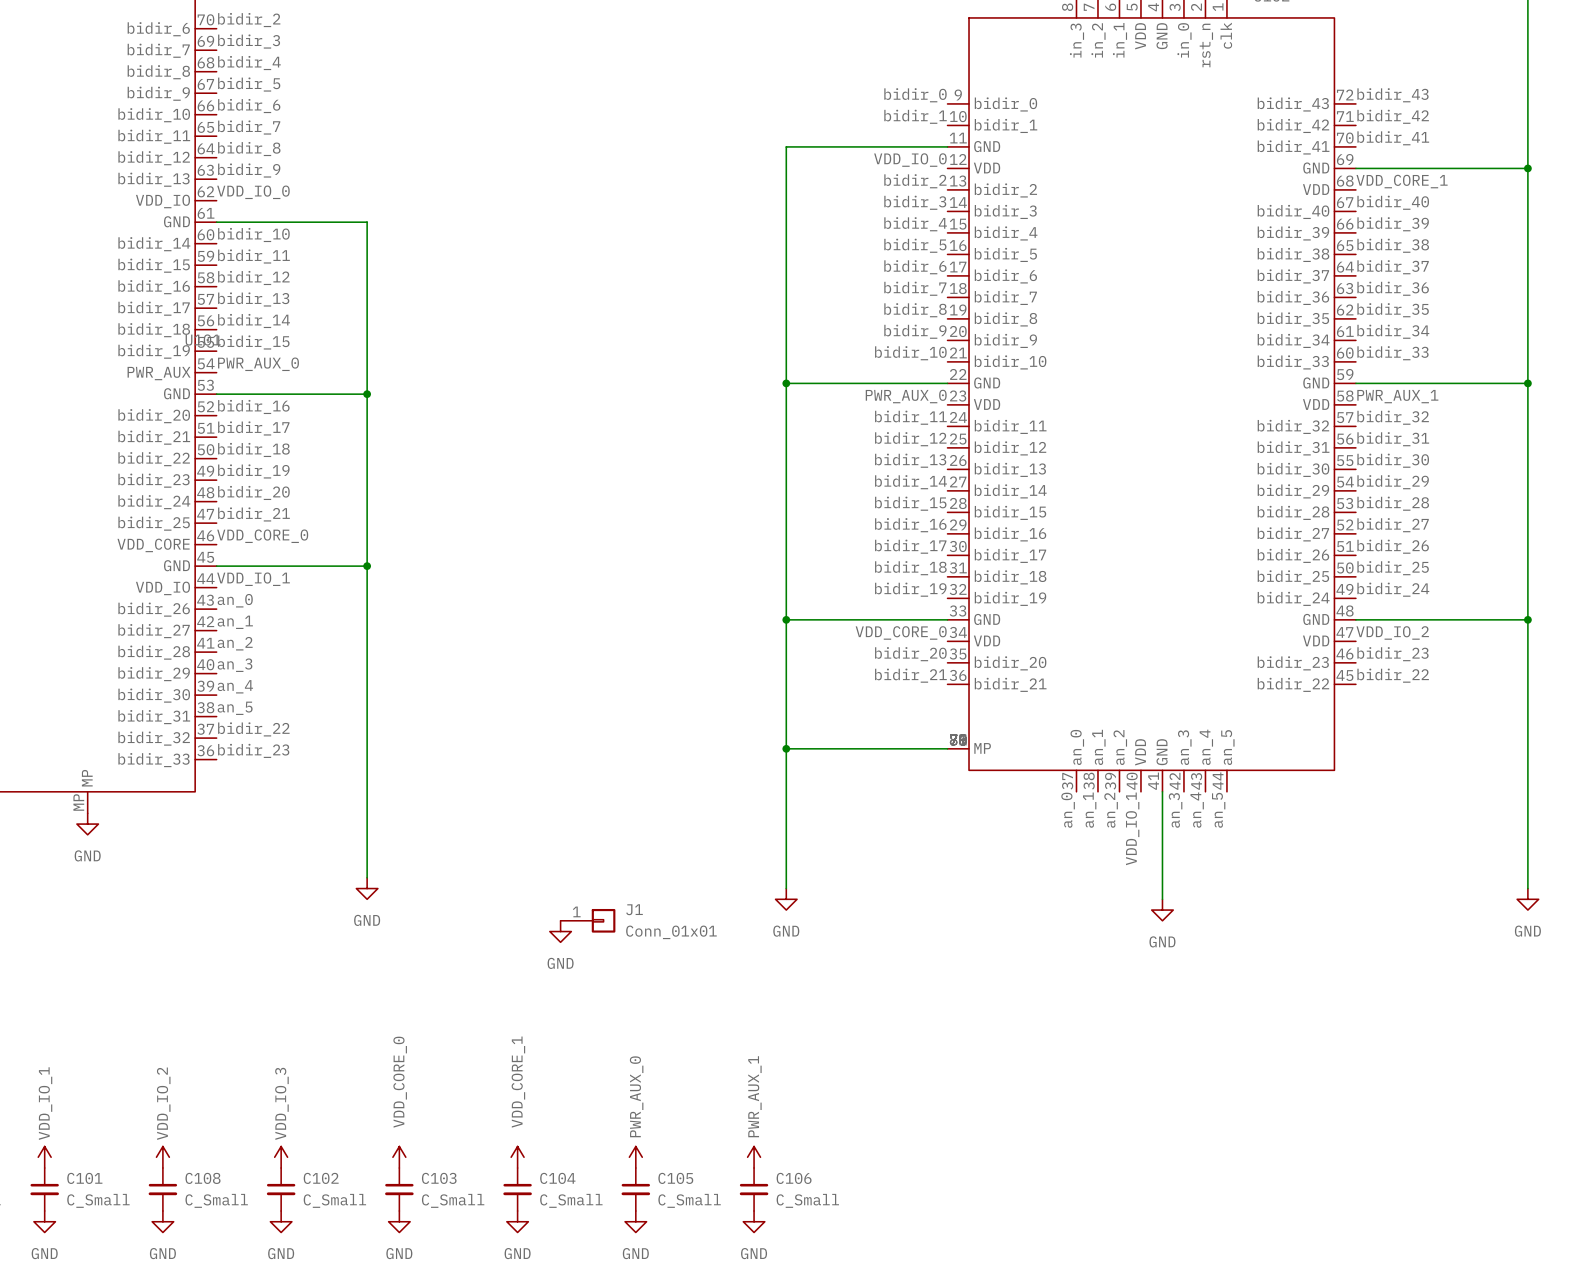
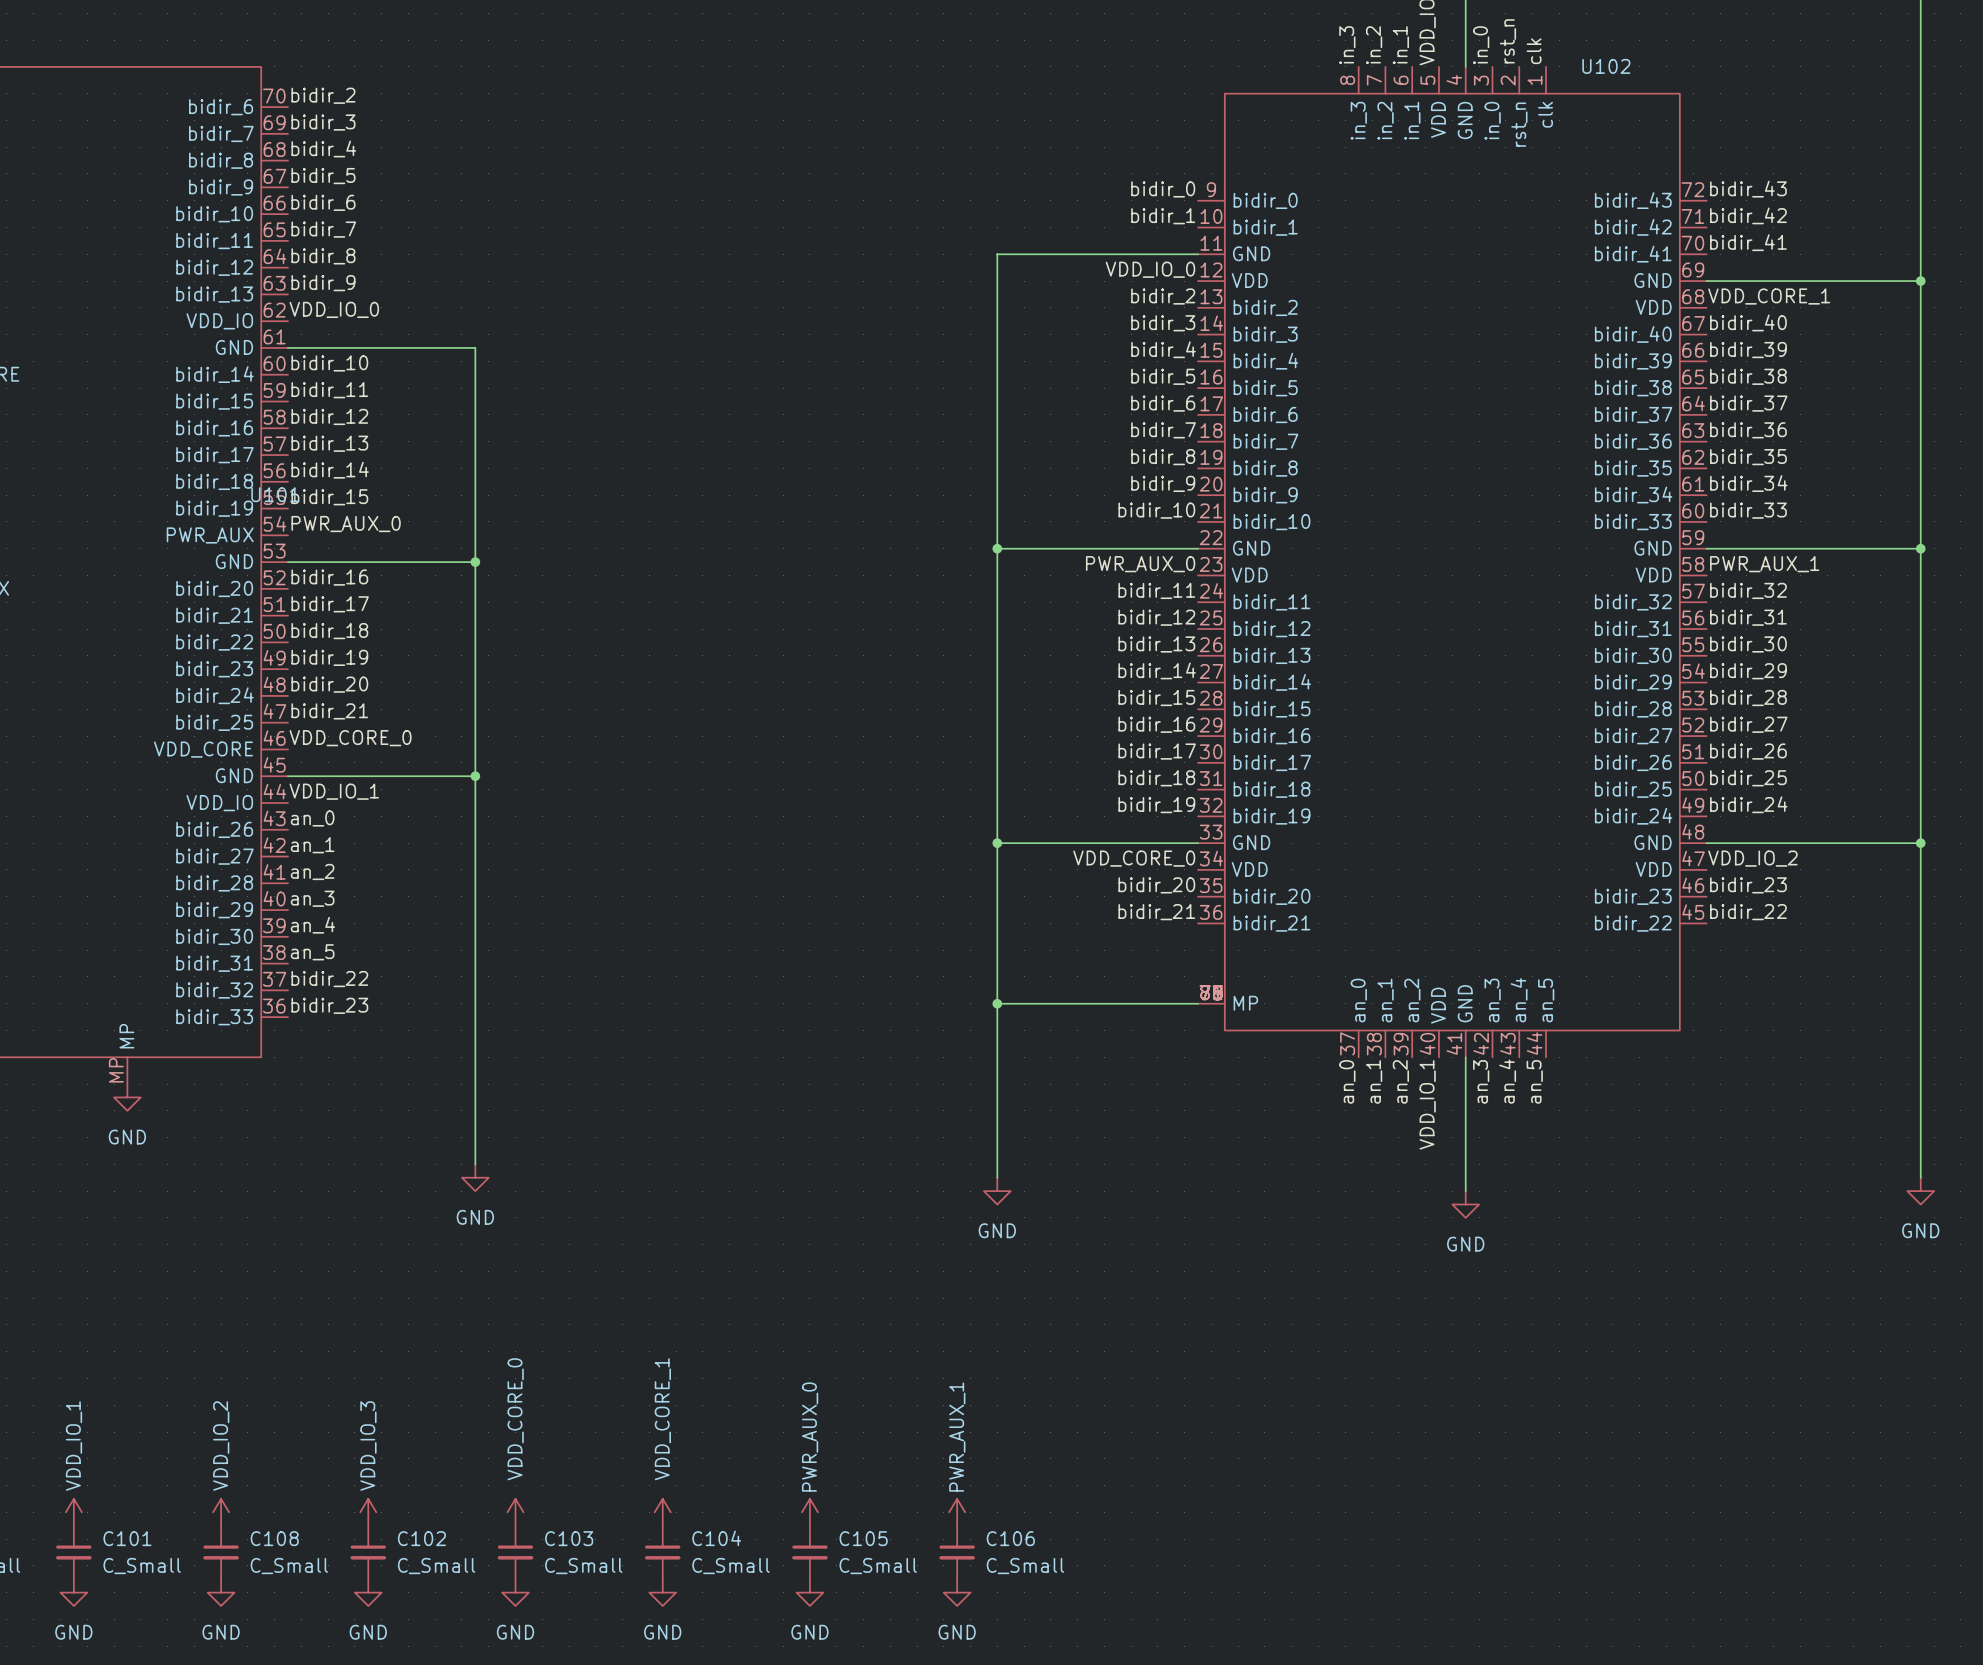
J1: Conn_01x01 (587, 920) -> none
power symbol: GND (560, 931) -> none

